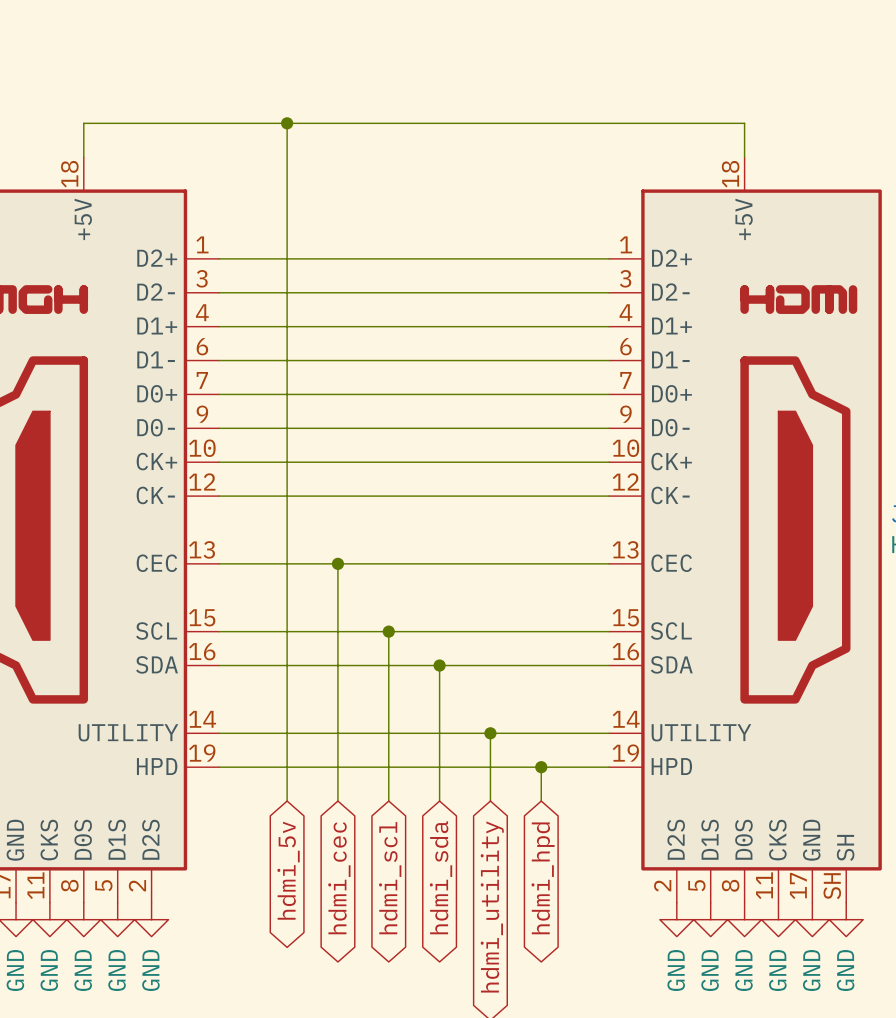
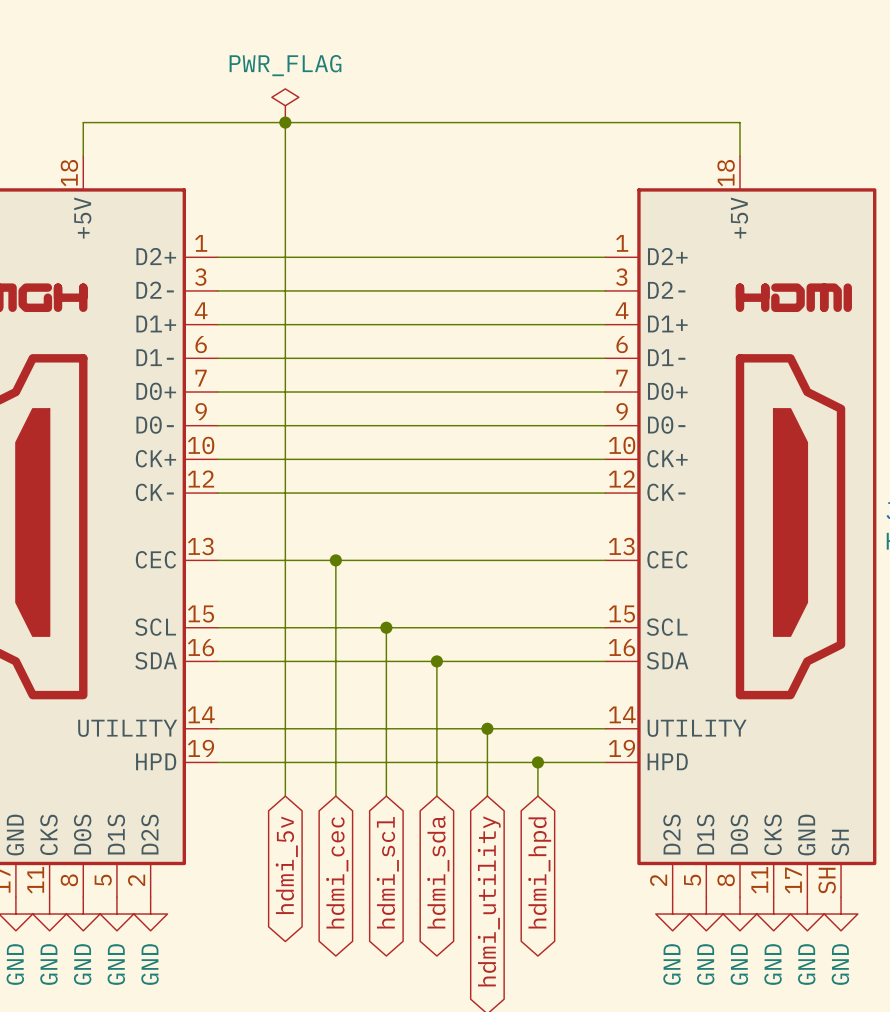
power symbol: none -> PWR_FLAG (285, 105)

